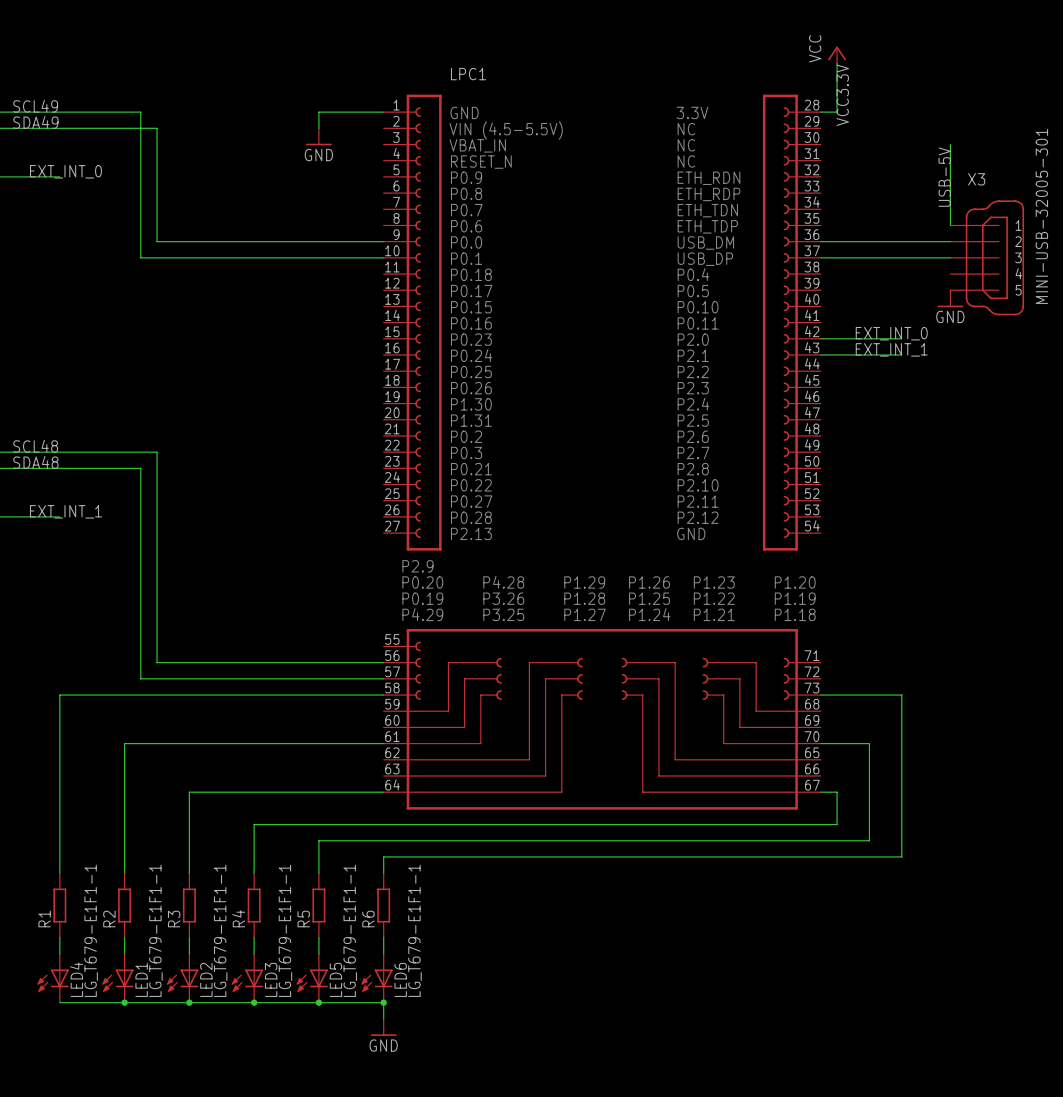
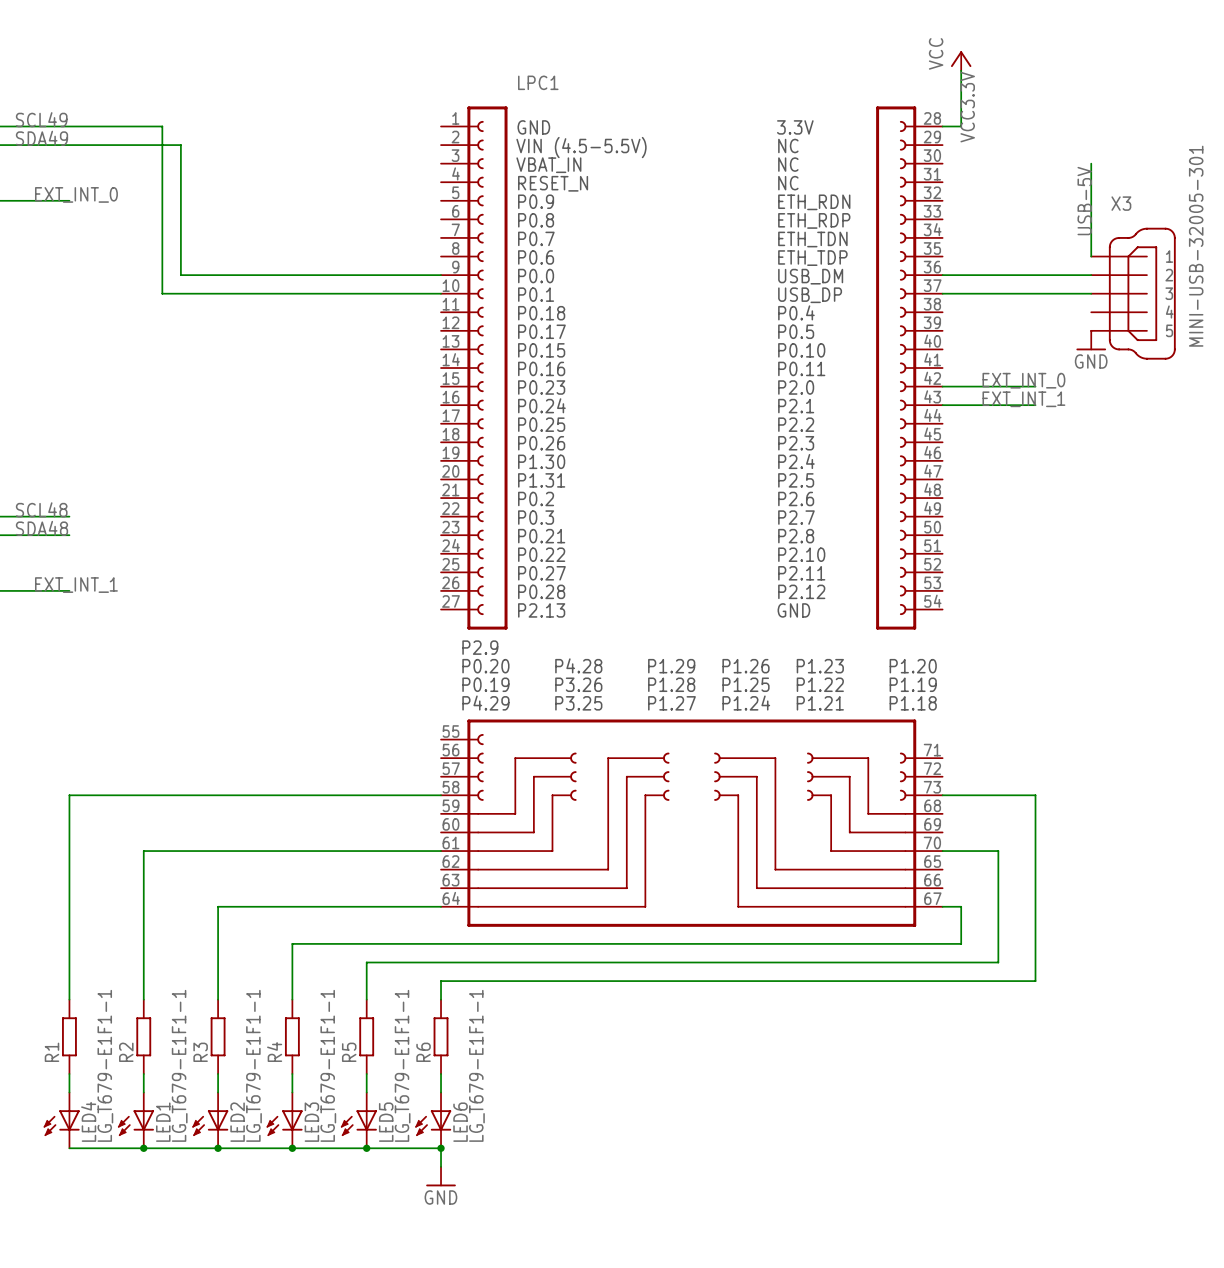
wire: (383, 112) (318, 112) (318, 128) -> none
power symbol: GND (318, 136) -> none
wire: (59, 452) (157, 452) (157, 662) (383, 662) -> none
wire: (59, 468) (140, 468) (140, 678) (383, 678) -> none

